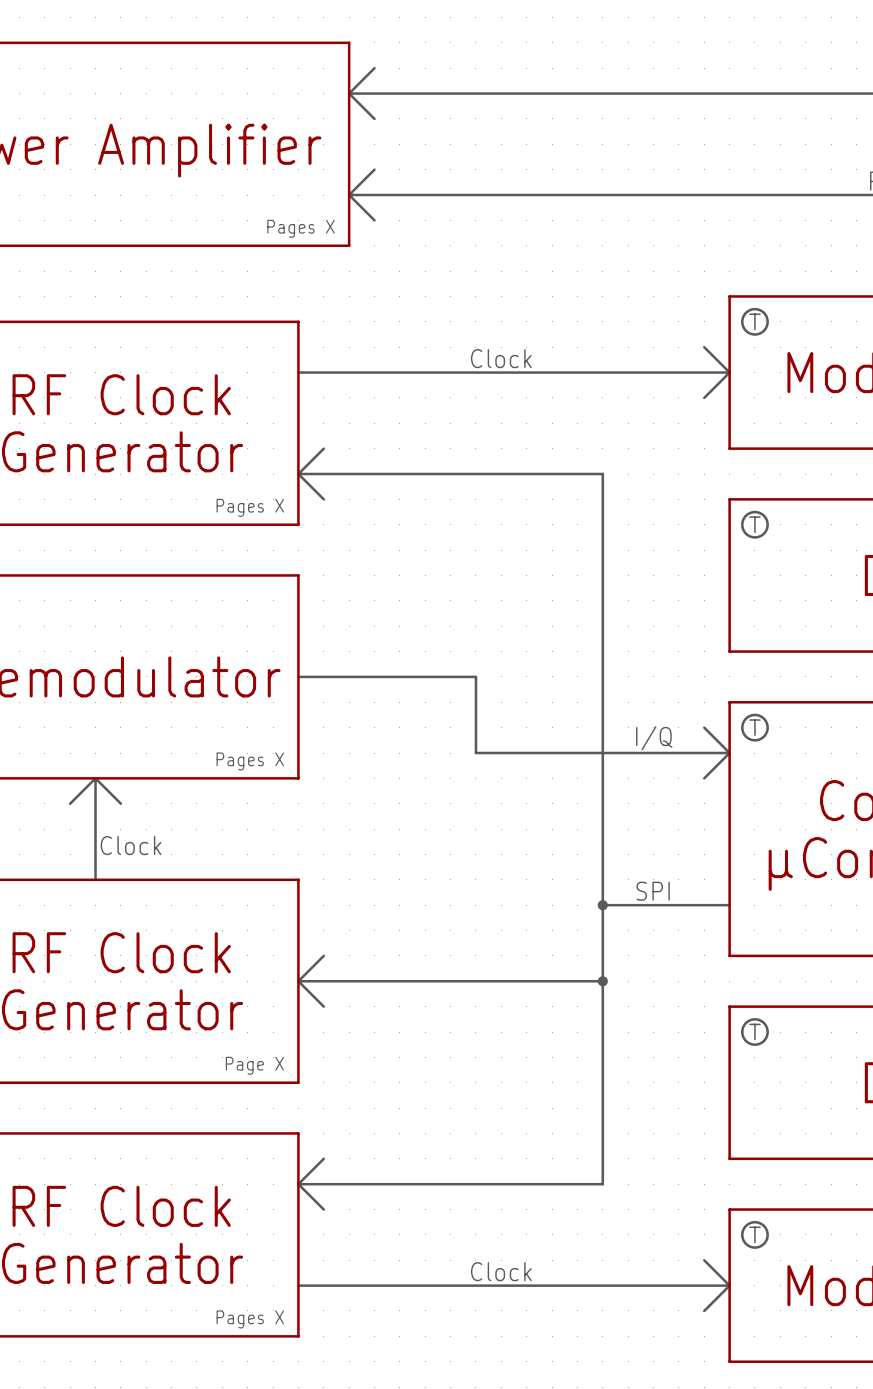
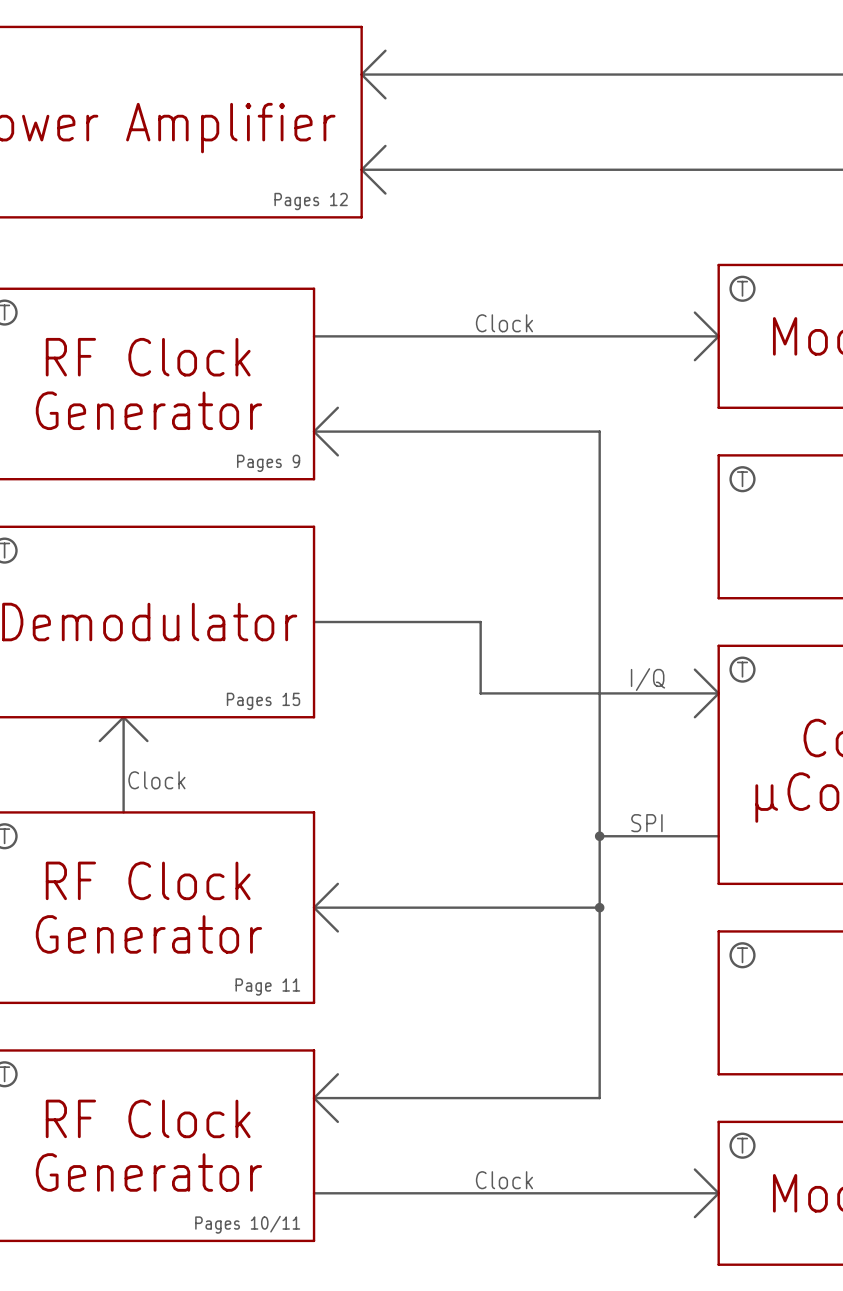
text: Pages X (301, 228) -> Pages 12 (311, 201)
text: Pages X (250, 507) -> Pages 9 (268, 463)
text: Pages X (250, 761) -> Pages 15 (263, 701)
text: Page X (254, 1065) -> Page 11 (267, 987)
text: Pages X (250, 1319) -> Pages 10/11 (247, 1224)

